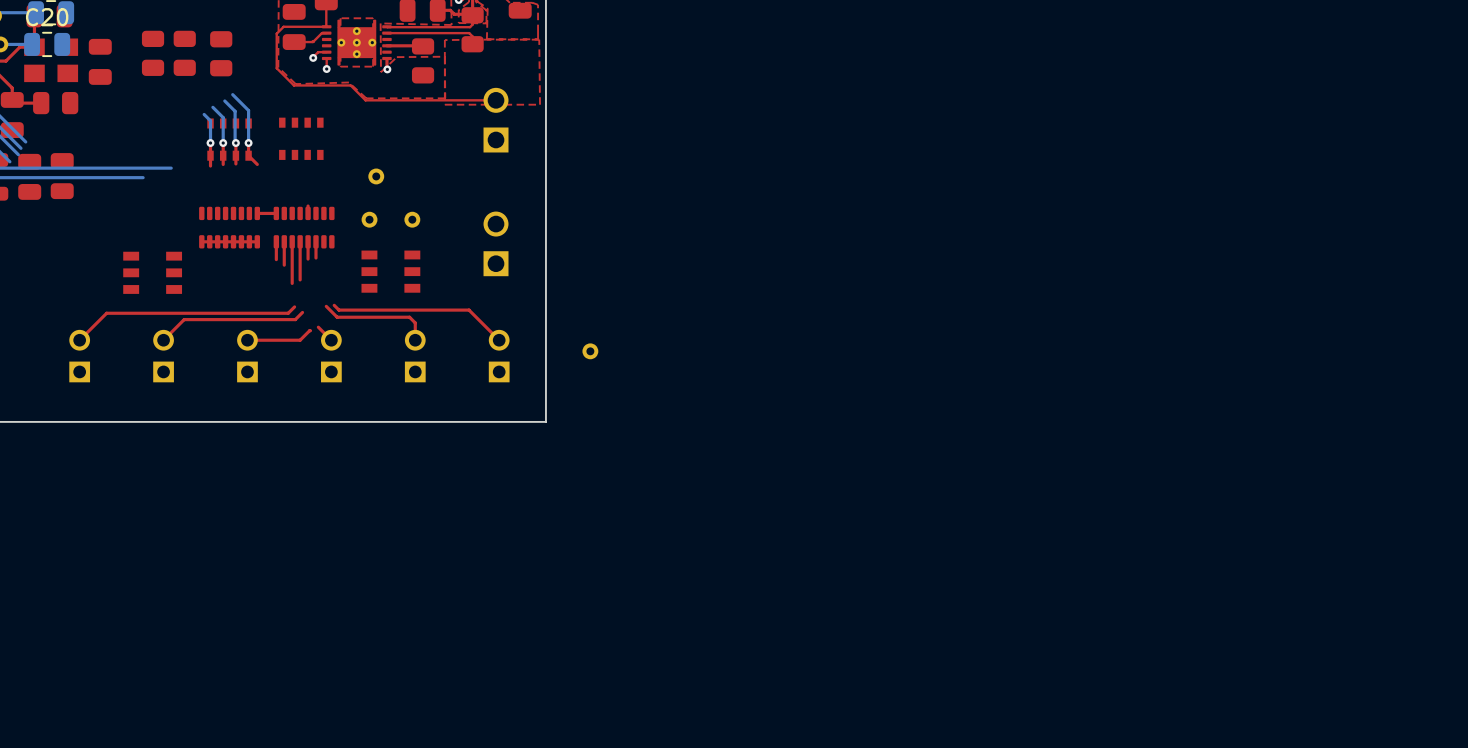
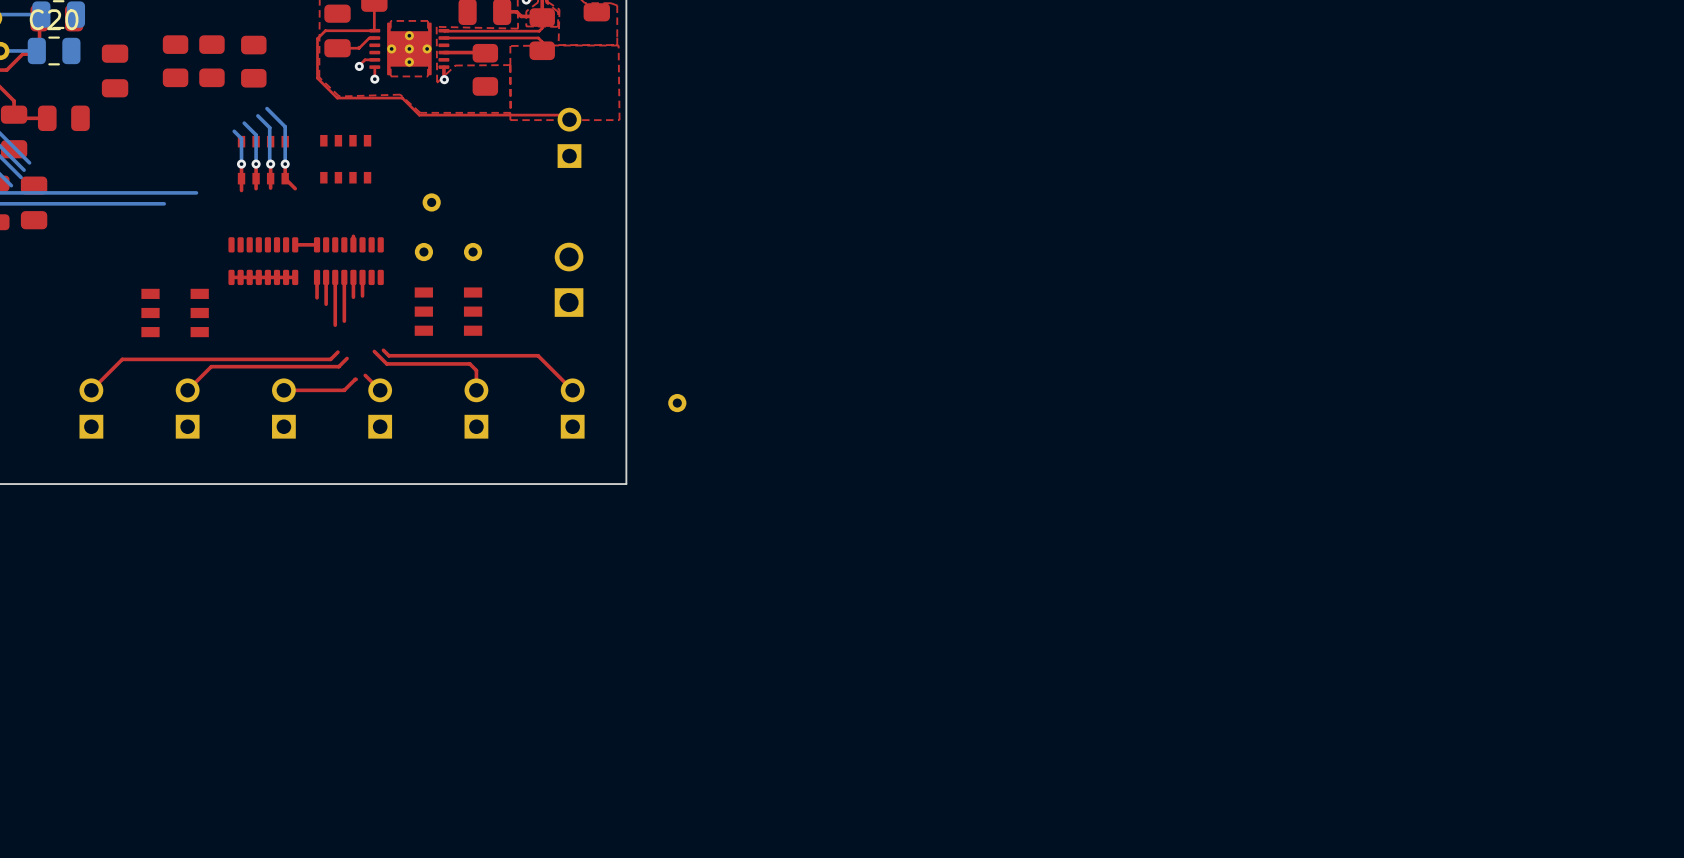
part: (51, 60) -> none
part footprint: [483, 87, 509, 153] -> [557, 107, 582, 168]
part: (62, 176) -> none

